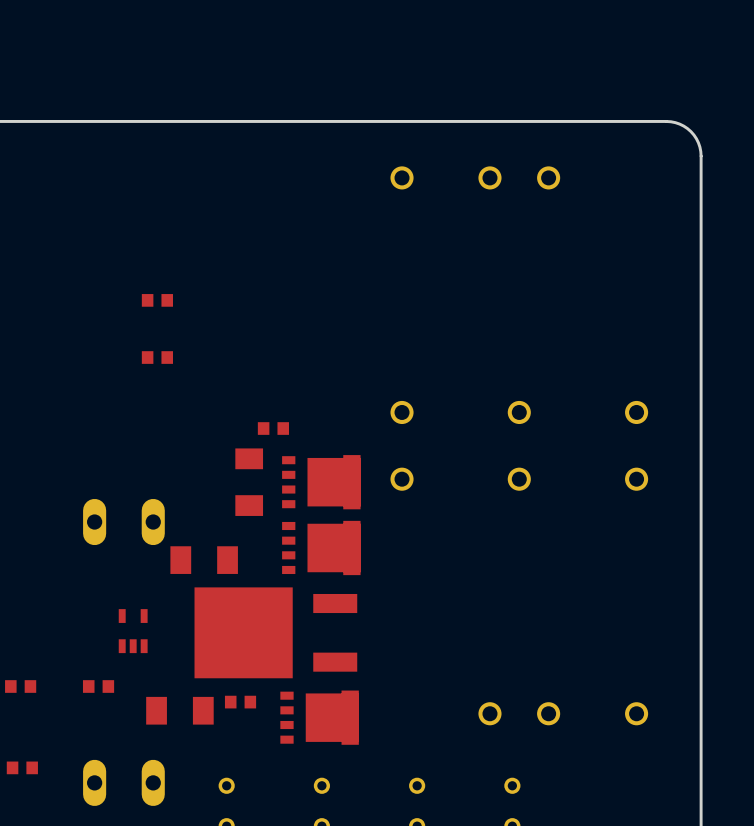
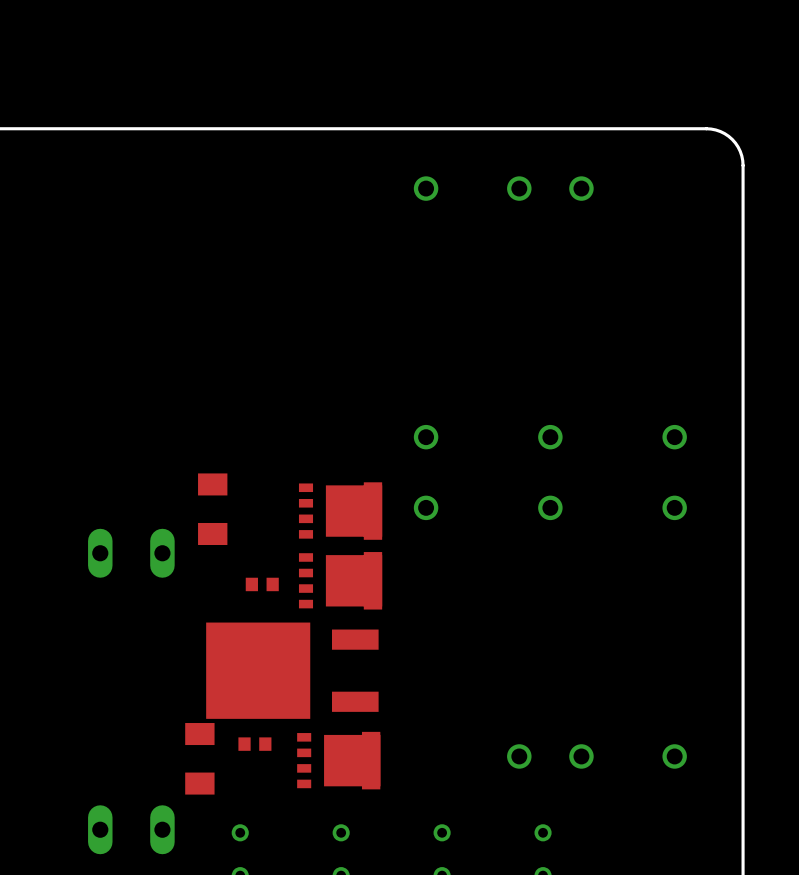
part: (157, 300) -> none
part: (157, 357) -> none
part: (273, 428) -> none
part: none -> (212, 509)
part: (249, 482) -> none
part: none -> (262, 584)
part: (204, 560) -> none
part: (133, 631) -> none
part: (20, 686) -> none
part: (98, 686) -> none
part rotation: 0° (179, 710) -> 90° clockwise (199, 758)
part: (22, 767) -> none

